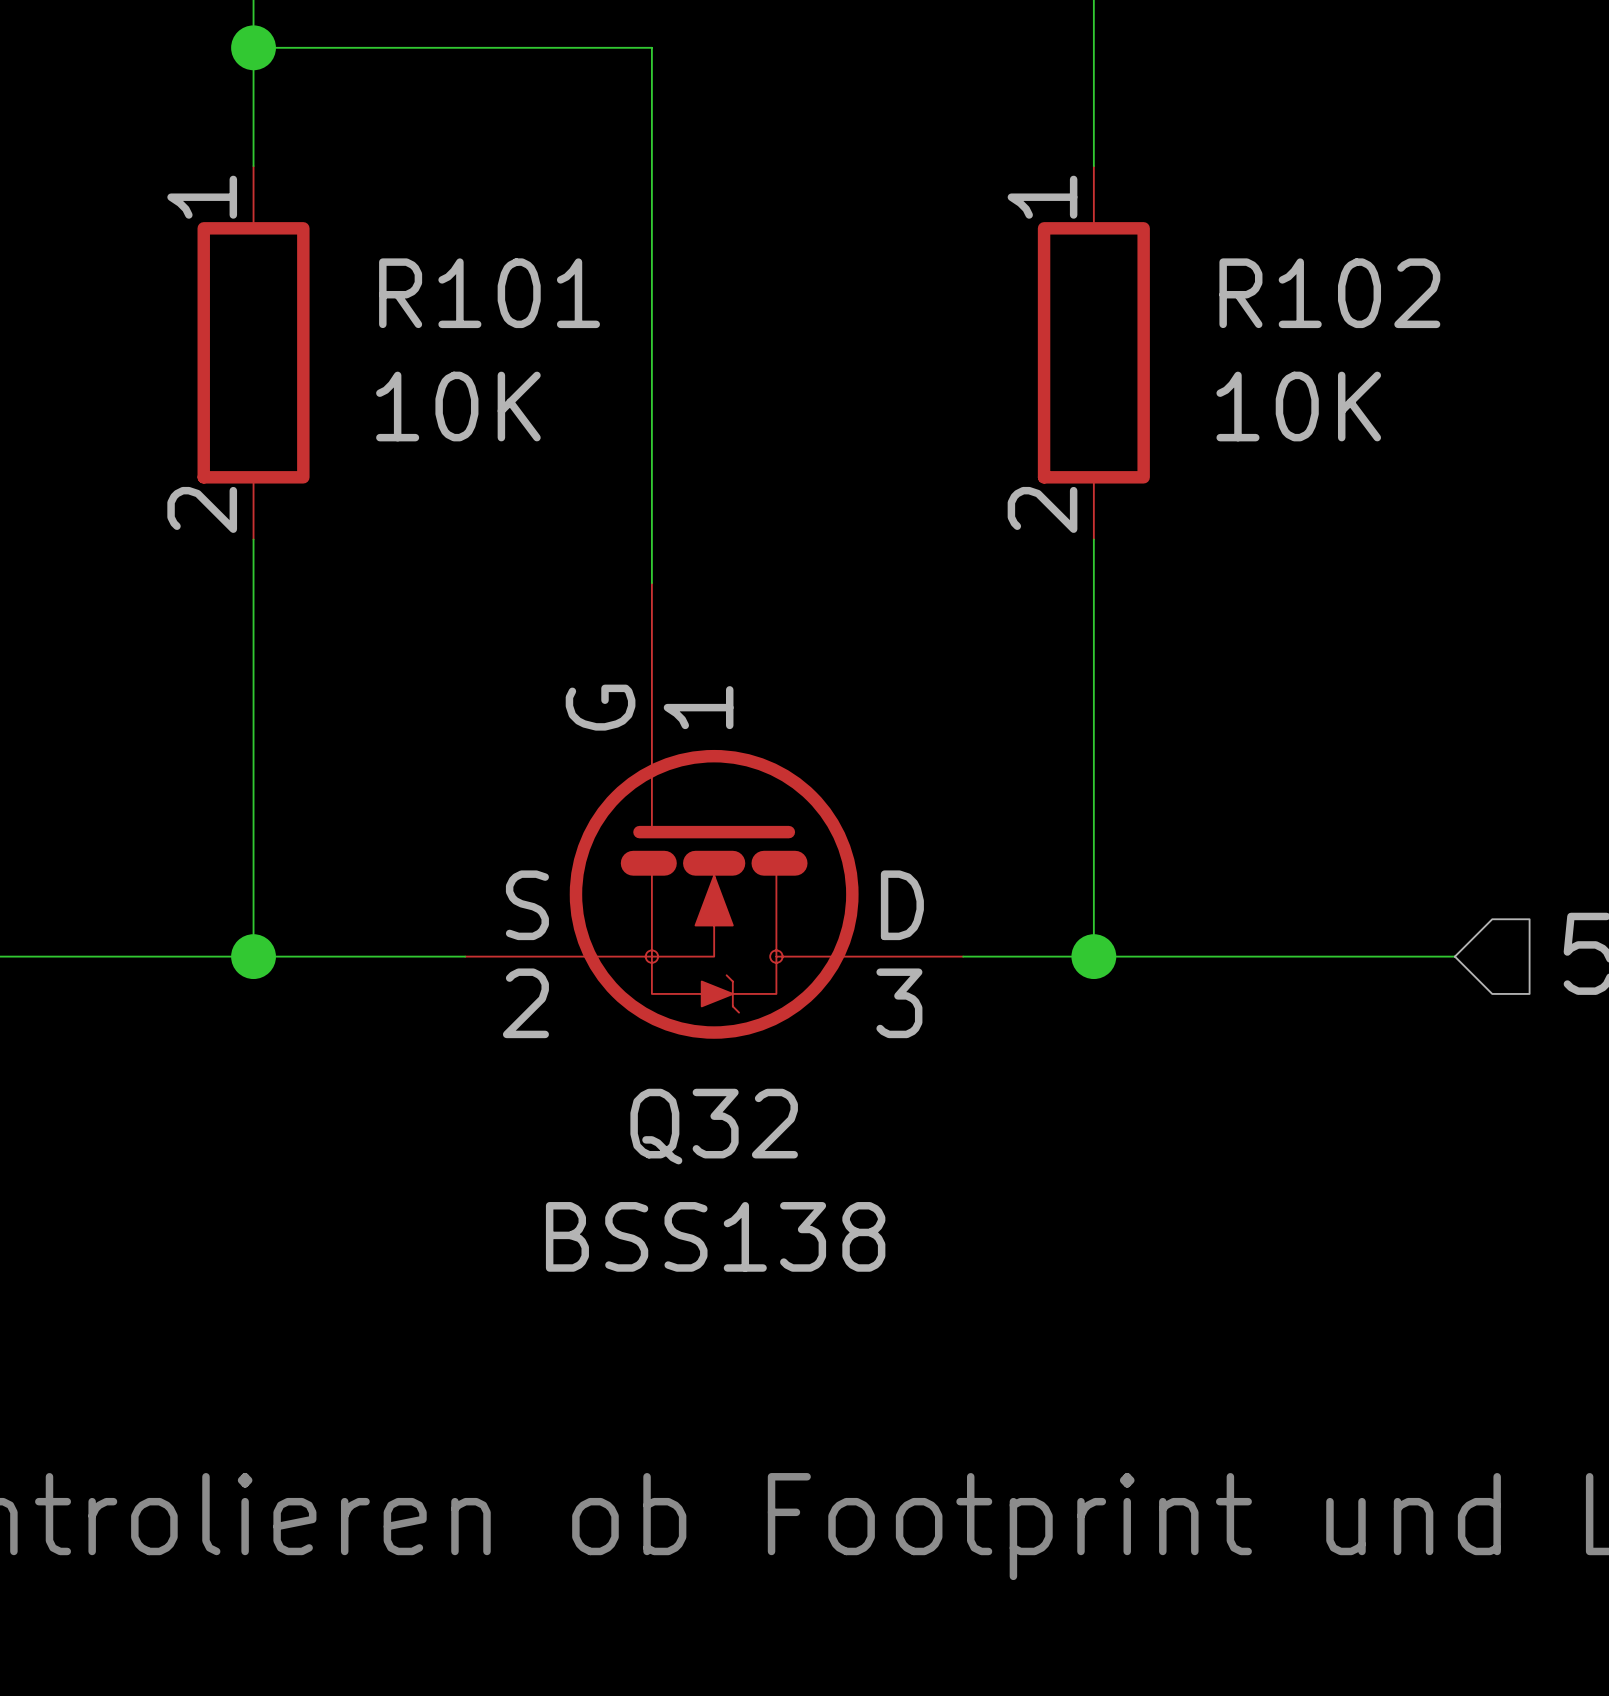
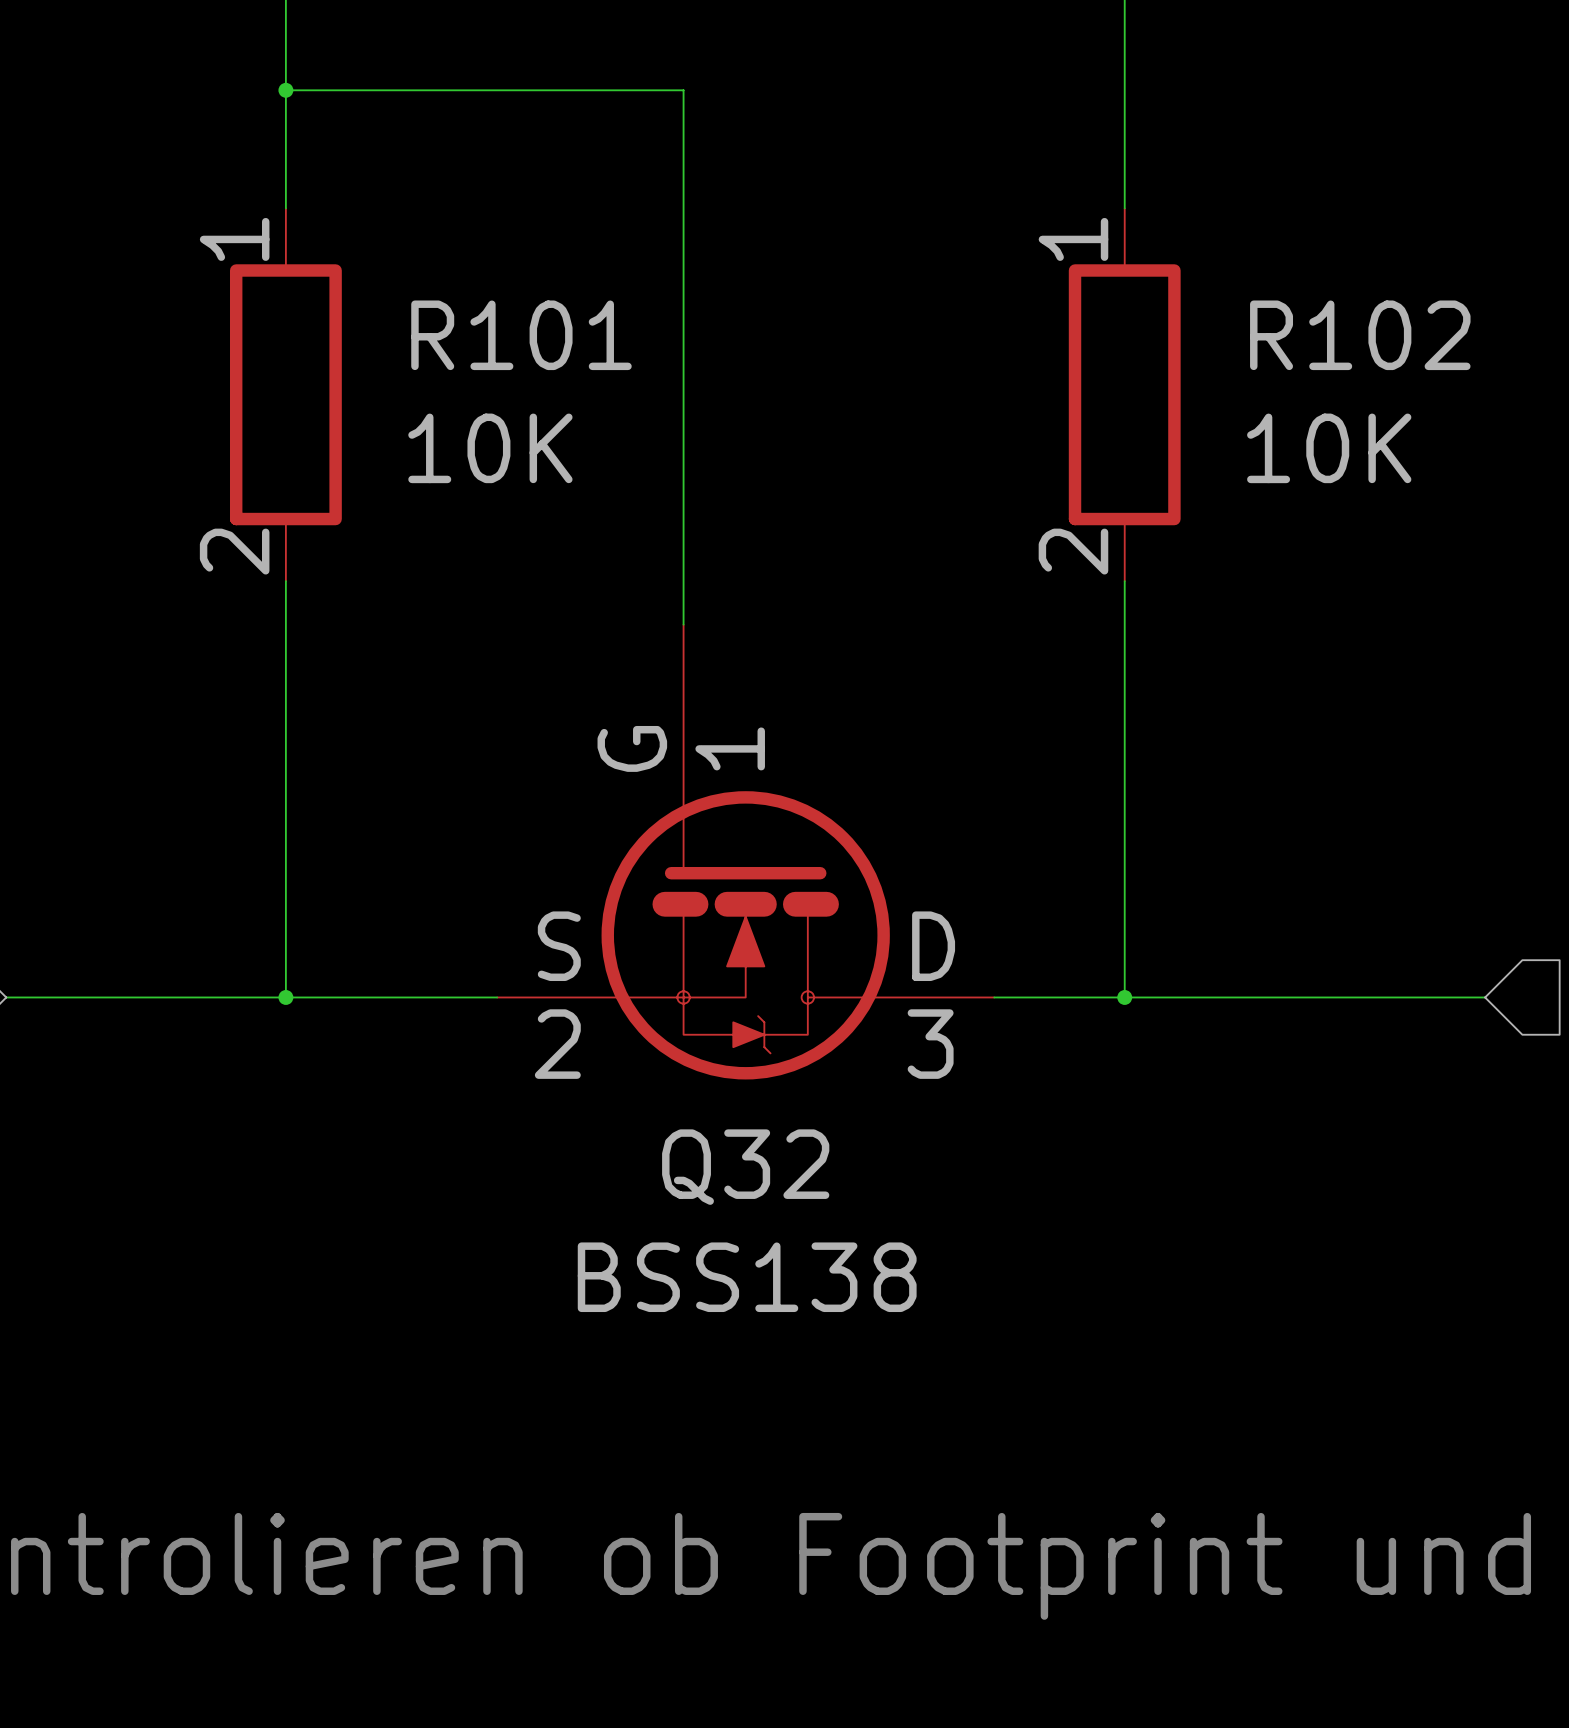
junction size: [231, 25, 276, 71] -> [278, 82, 294, 98]
junction size: [231, 934, 276, 980] -> [278, 990, 294, 1005]
junction size: [1071, 934, 1117, 980] -> [1117, 990, 1133, 1005]

